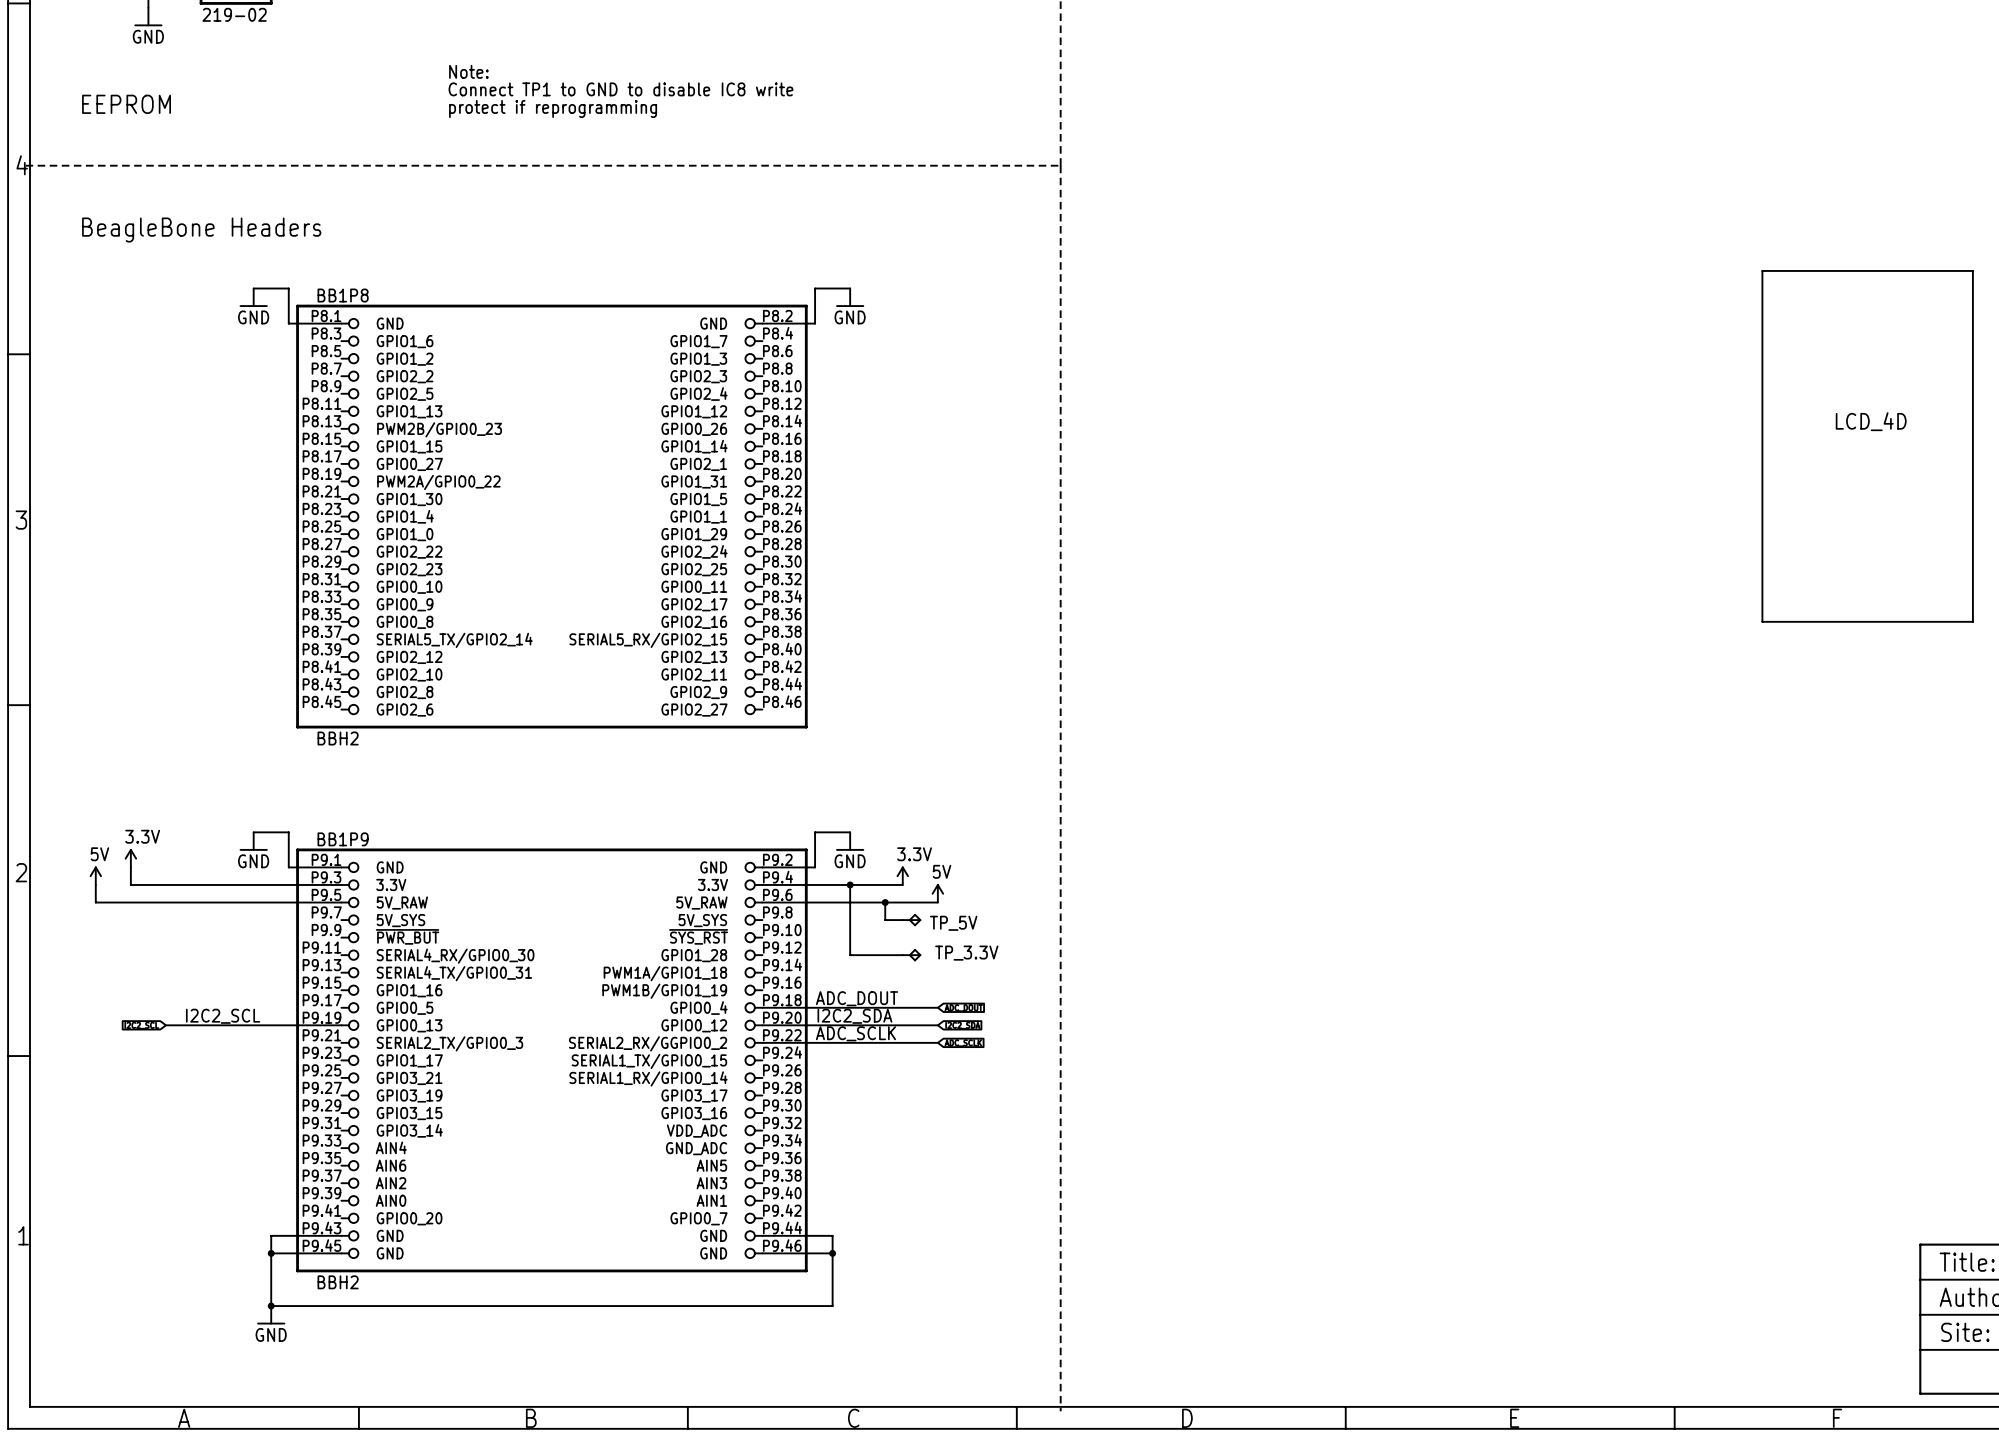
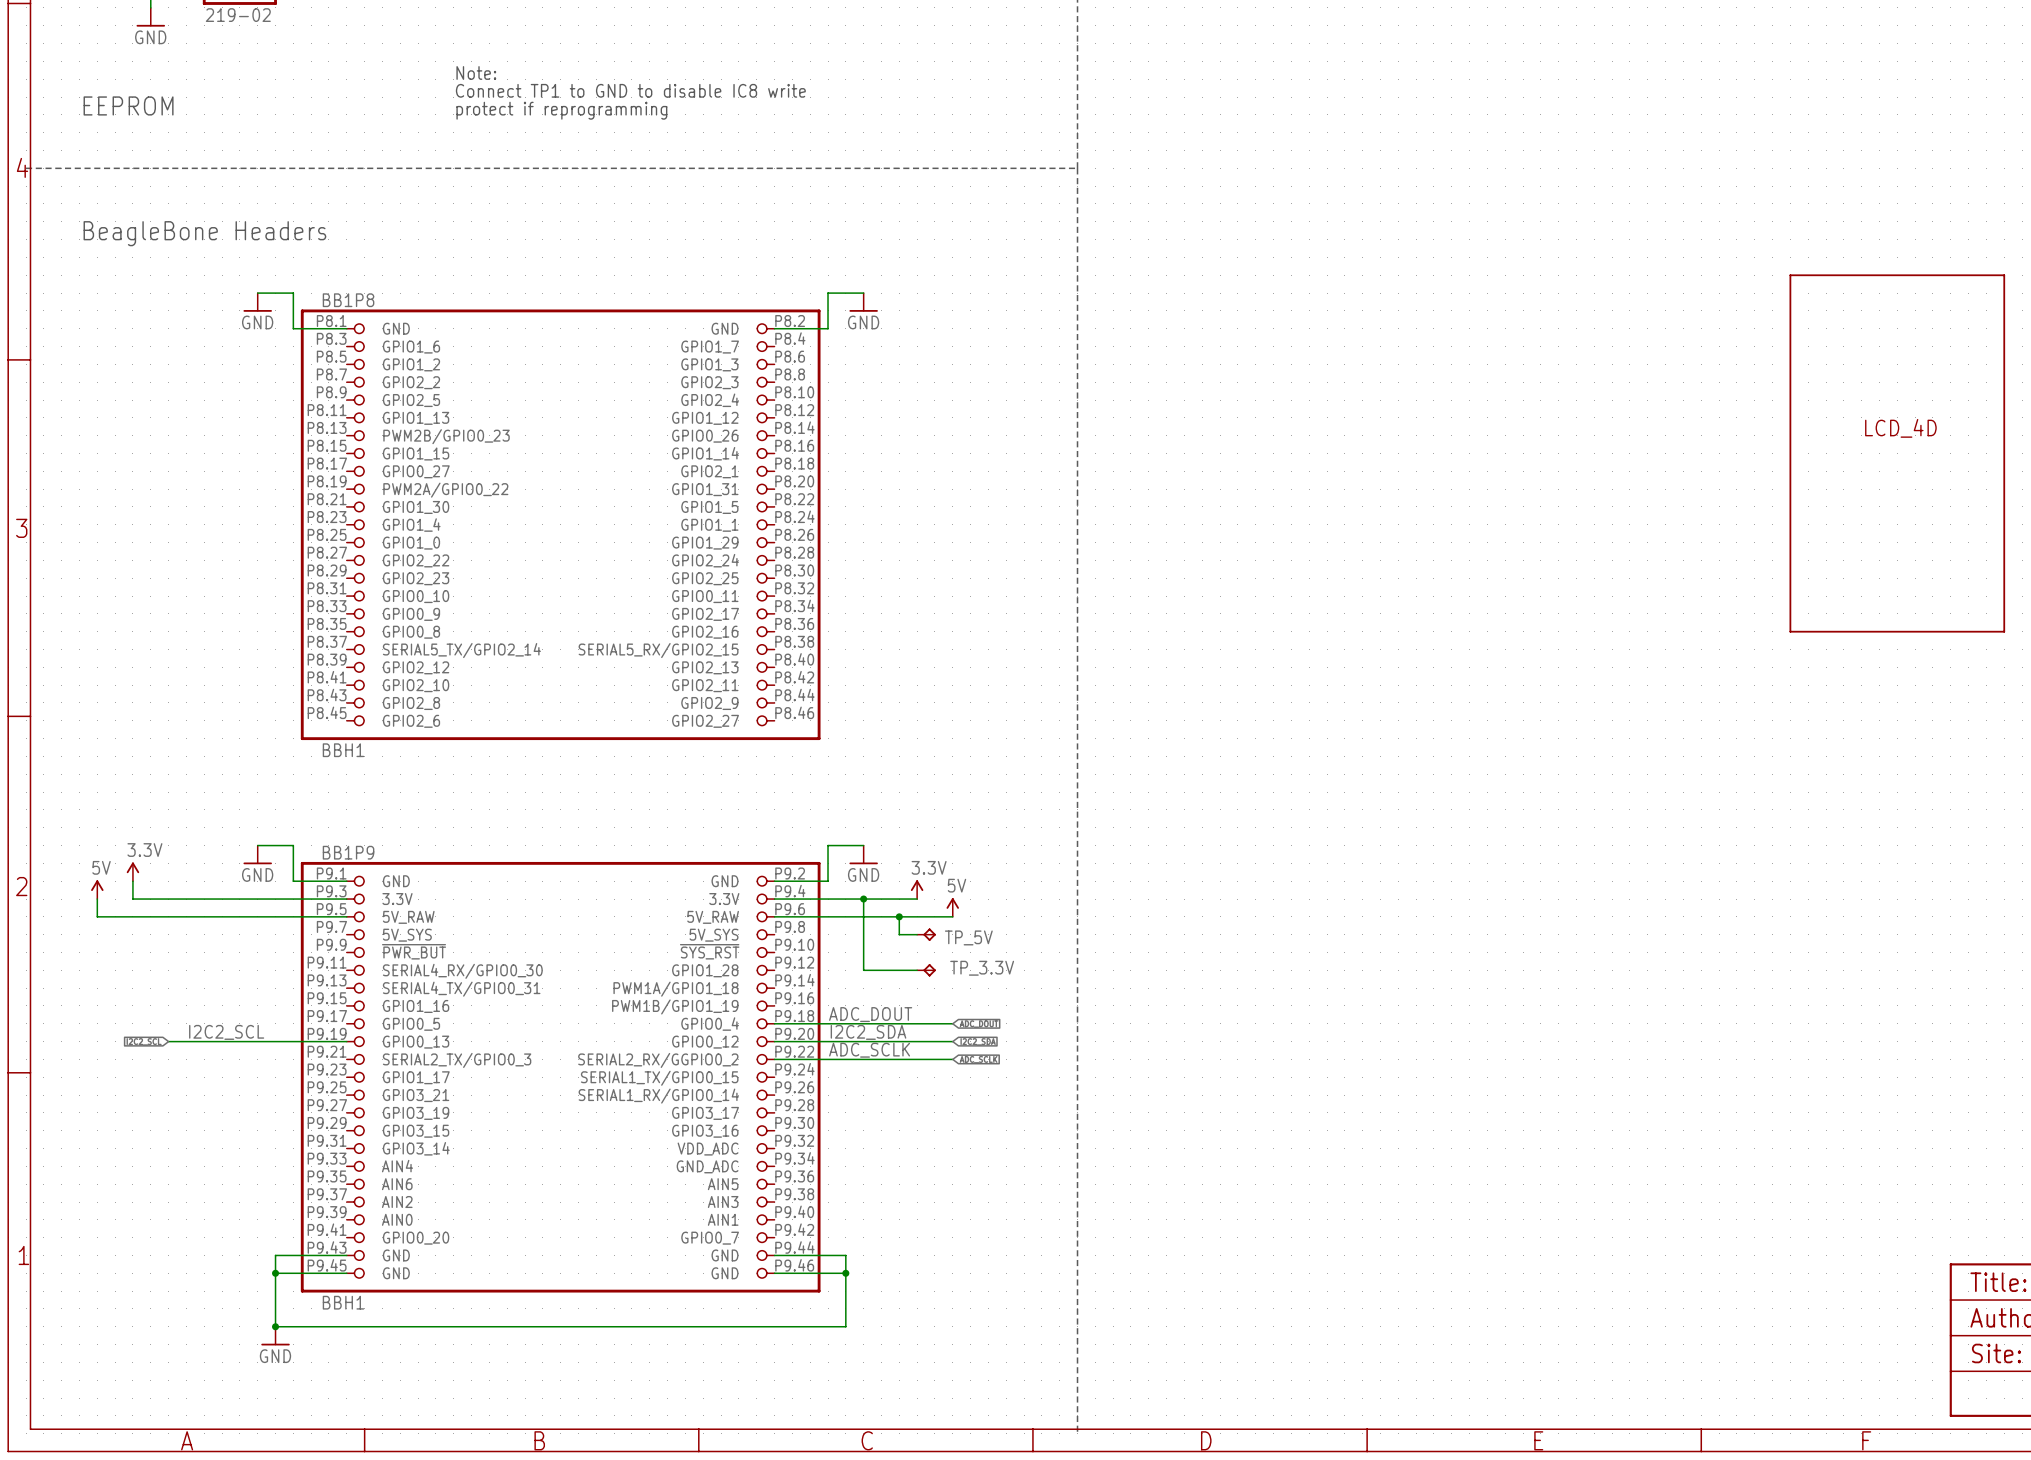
BB1P8 value: BBH2 (338, 738) -> BBH1 (343, 750)
BB1P9 value: BBH2 (338, 1282) -> BBH1 (343, 1302)

